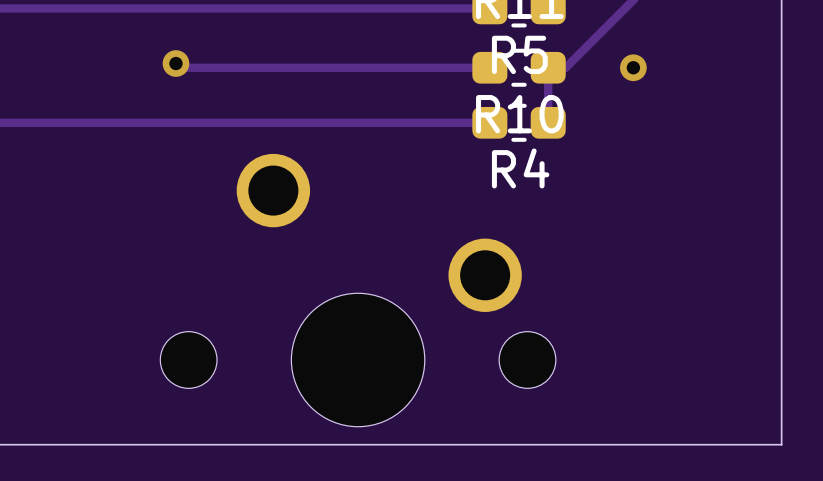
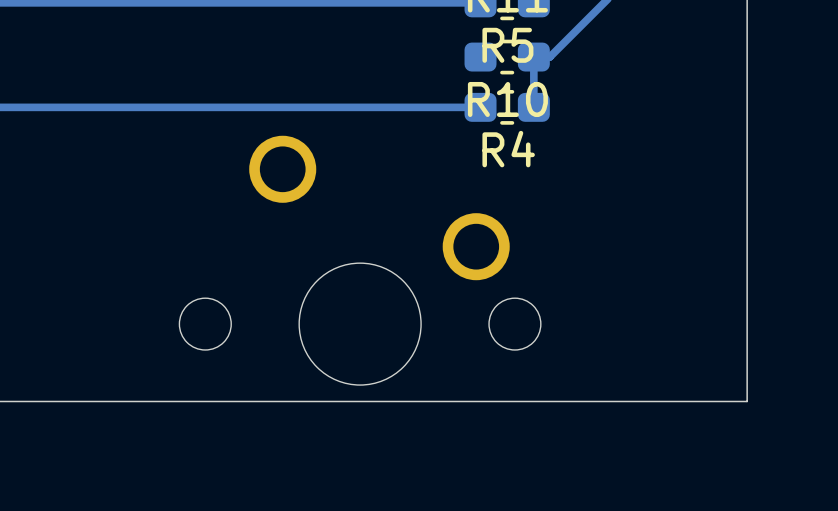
track: (175, 63) (180, 67) (489, 67) -> none
via: (175, 63) -> none
via: (633, 67) -> none

